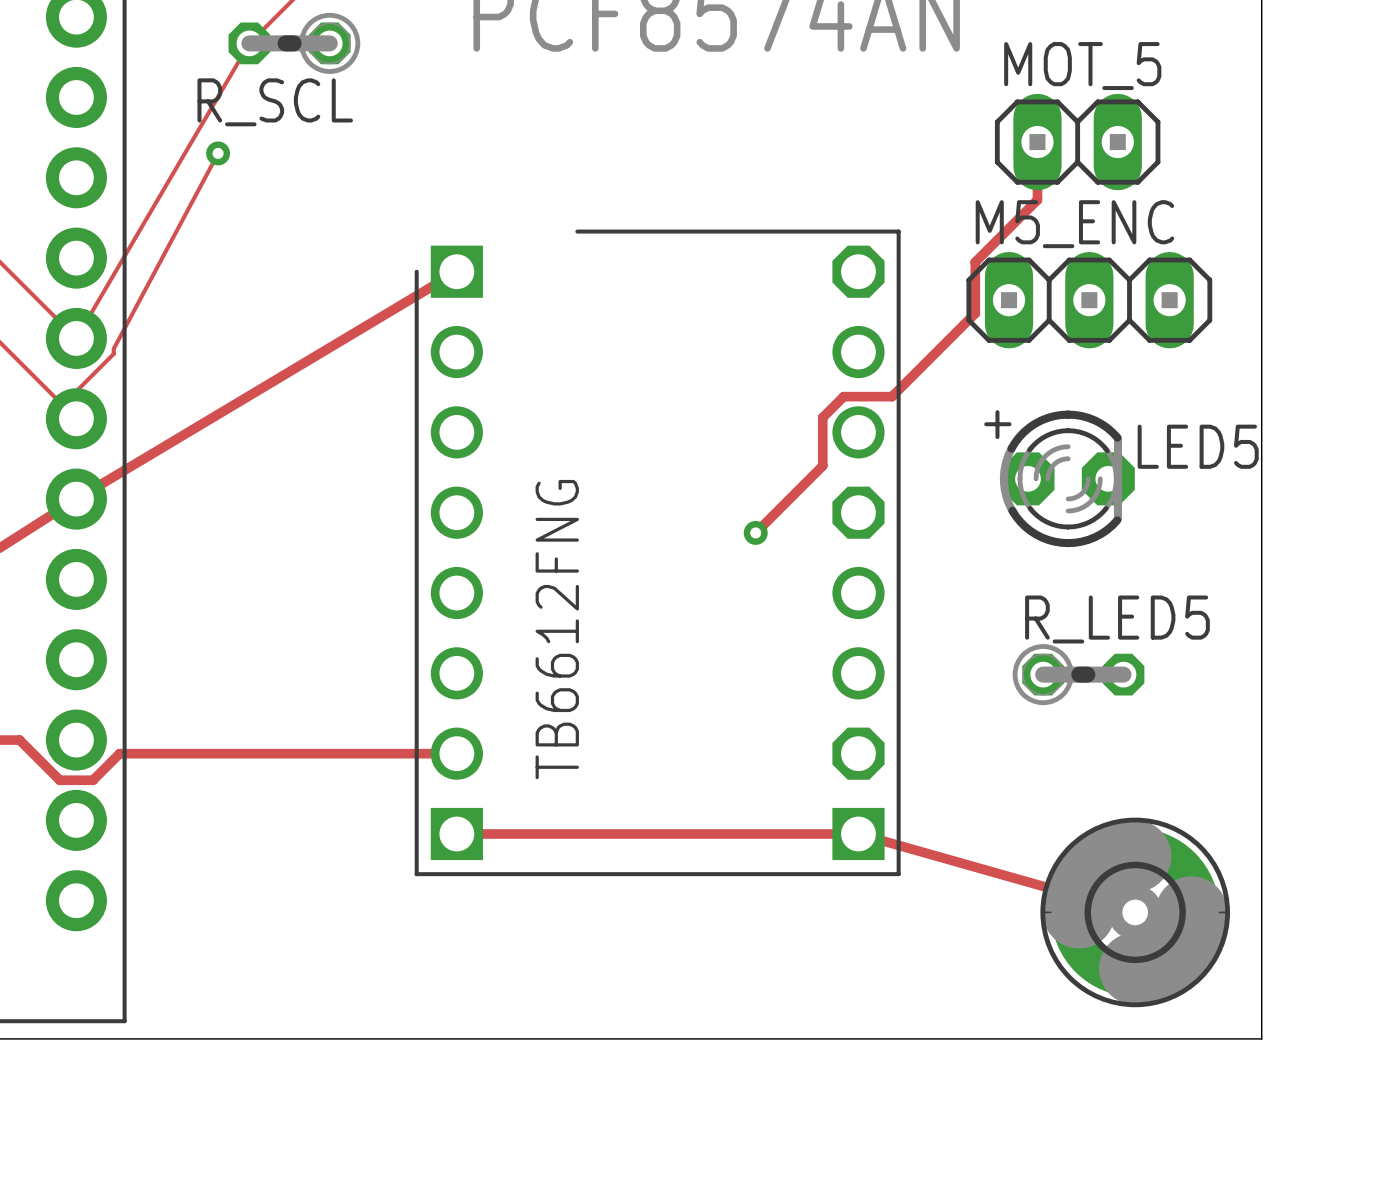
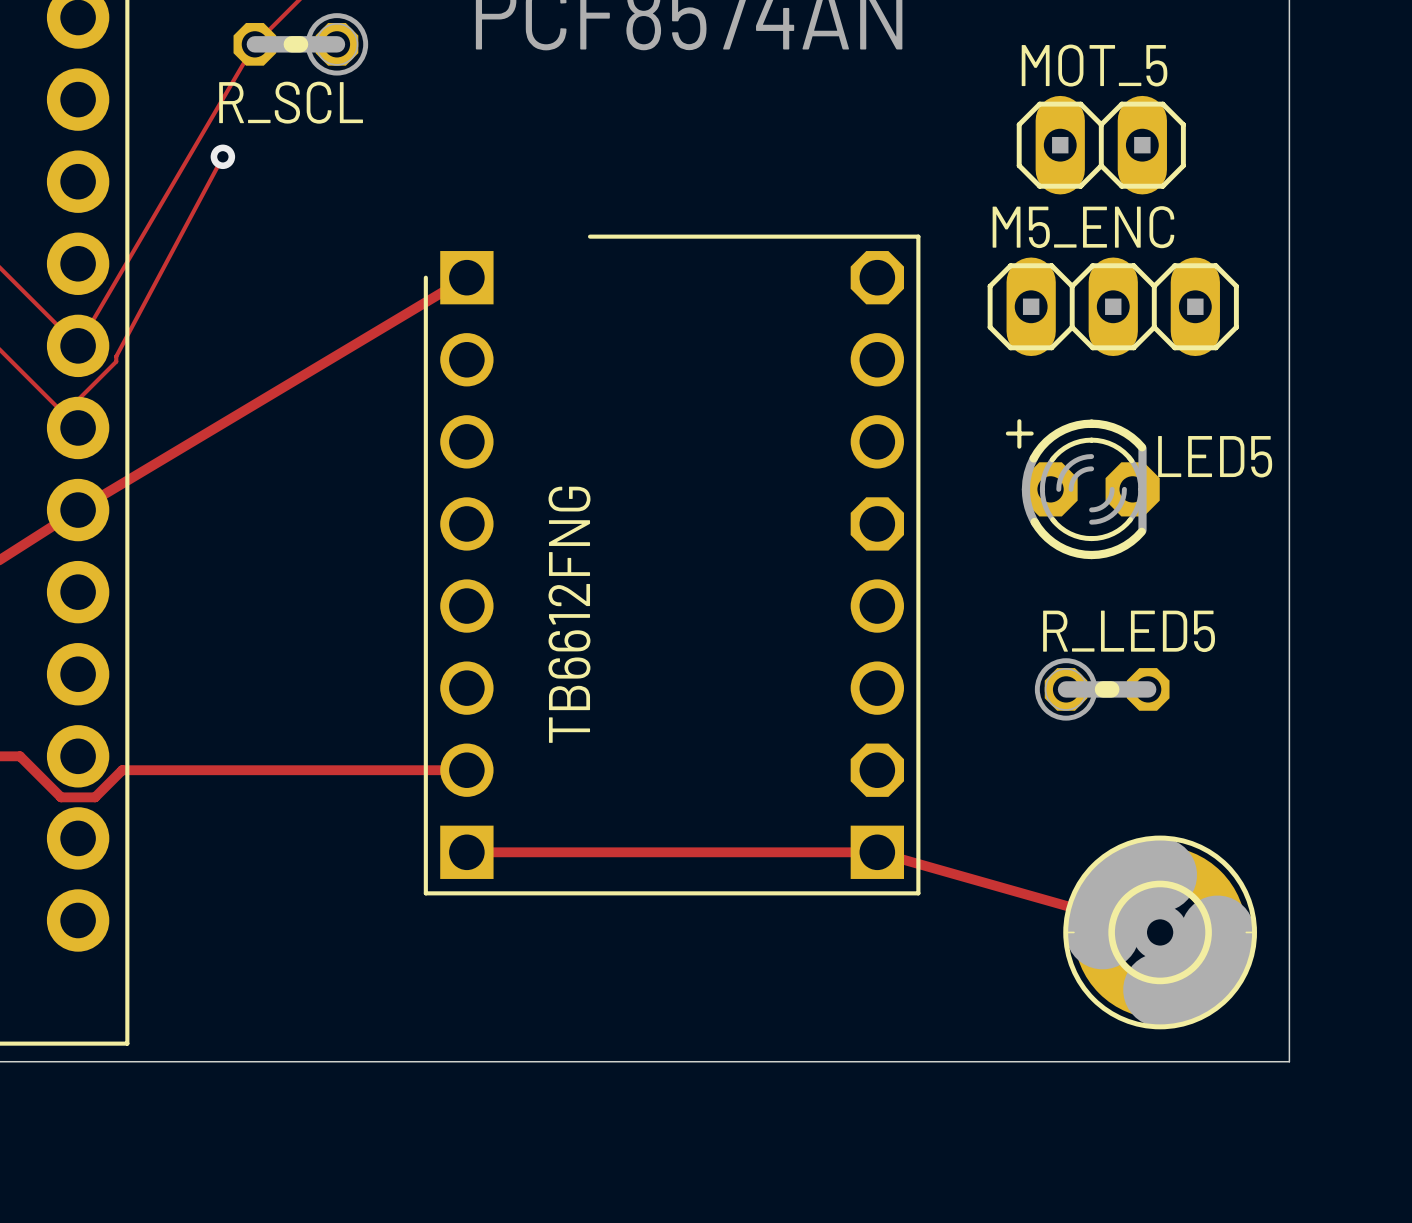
track: (1037, 142) (1037, 199) (975, 262) (975, 313) (892, 396) (843, 396) (822, 417) (822, 465) (755, 532) -> none
via: (755, 532) -> none

